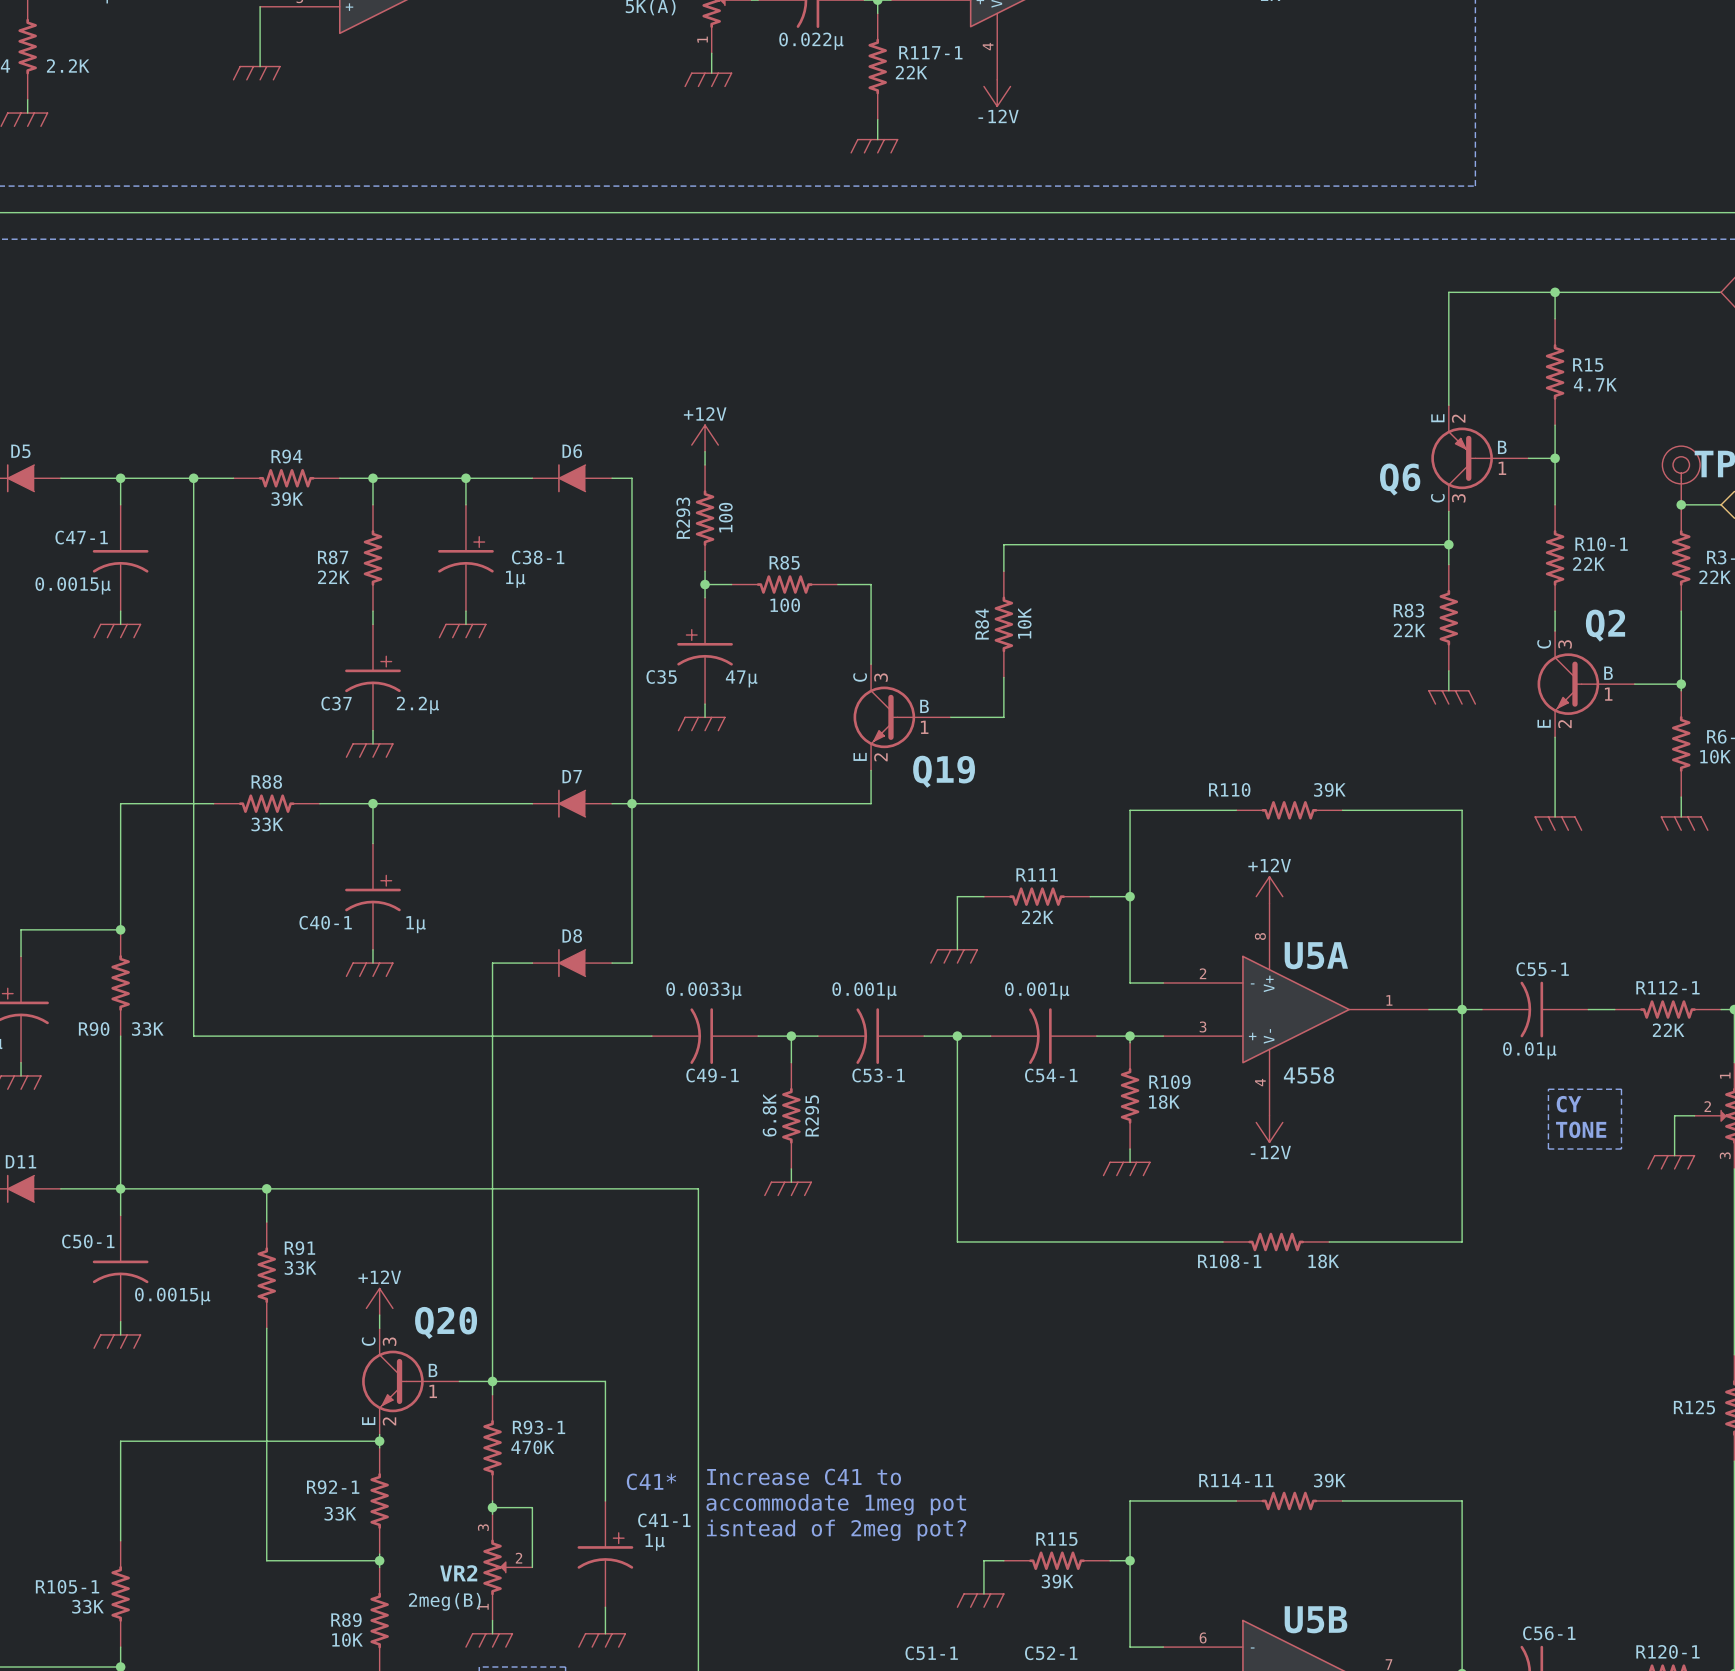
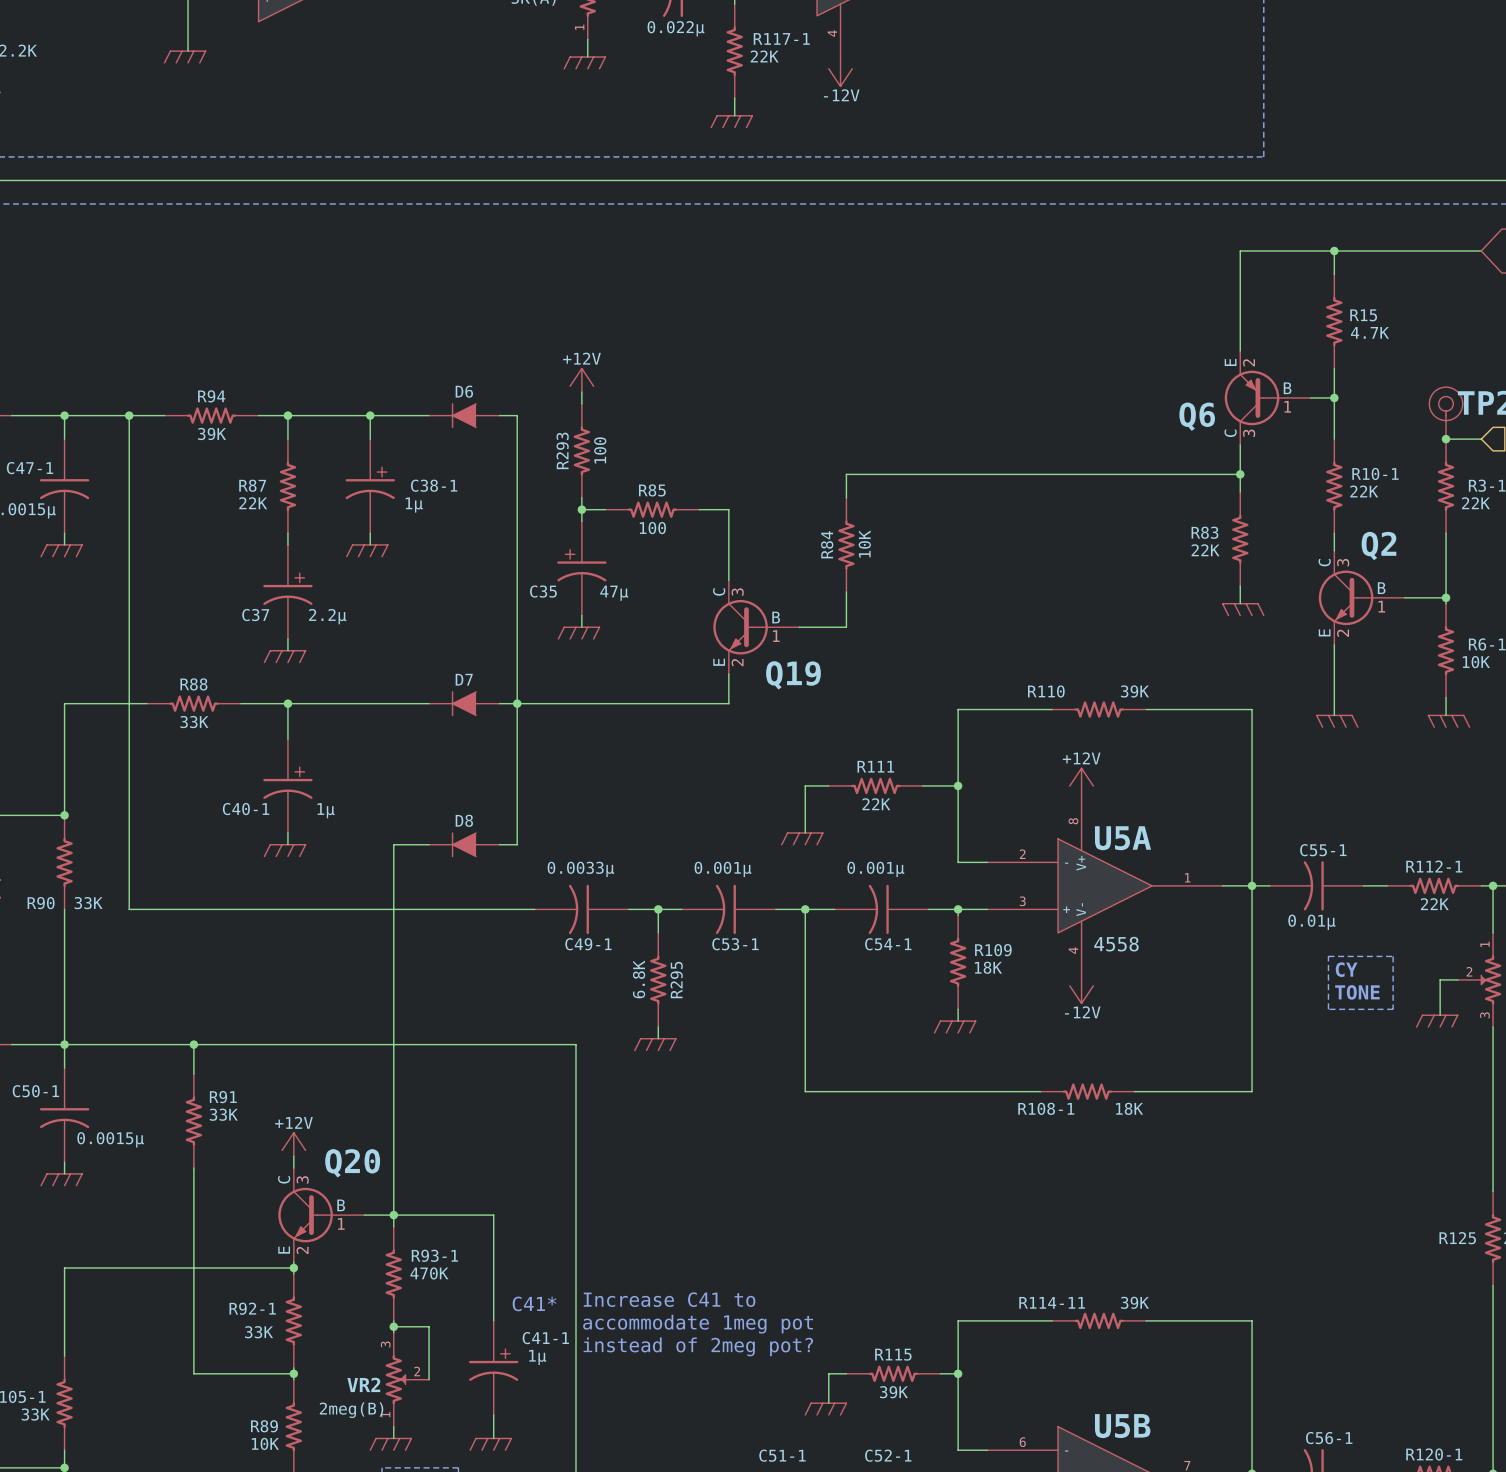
text: isntead of 2meg pot? (836, 1530) -> instead of 2meg pot? (698, 1346)

